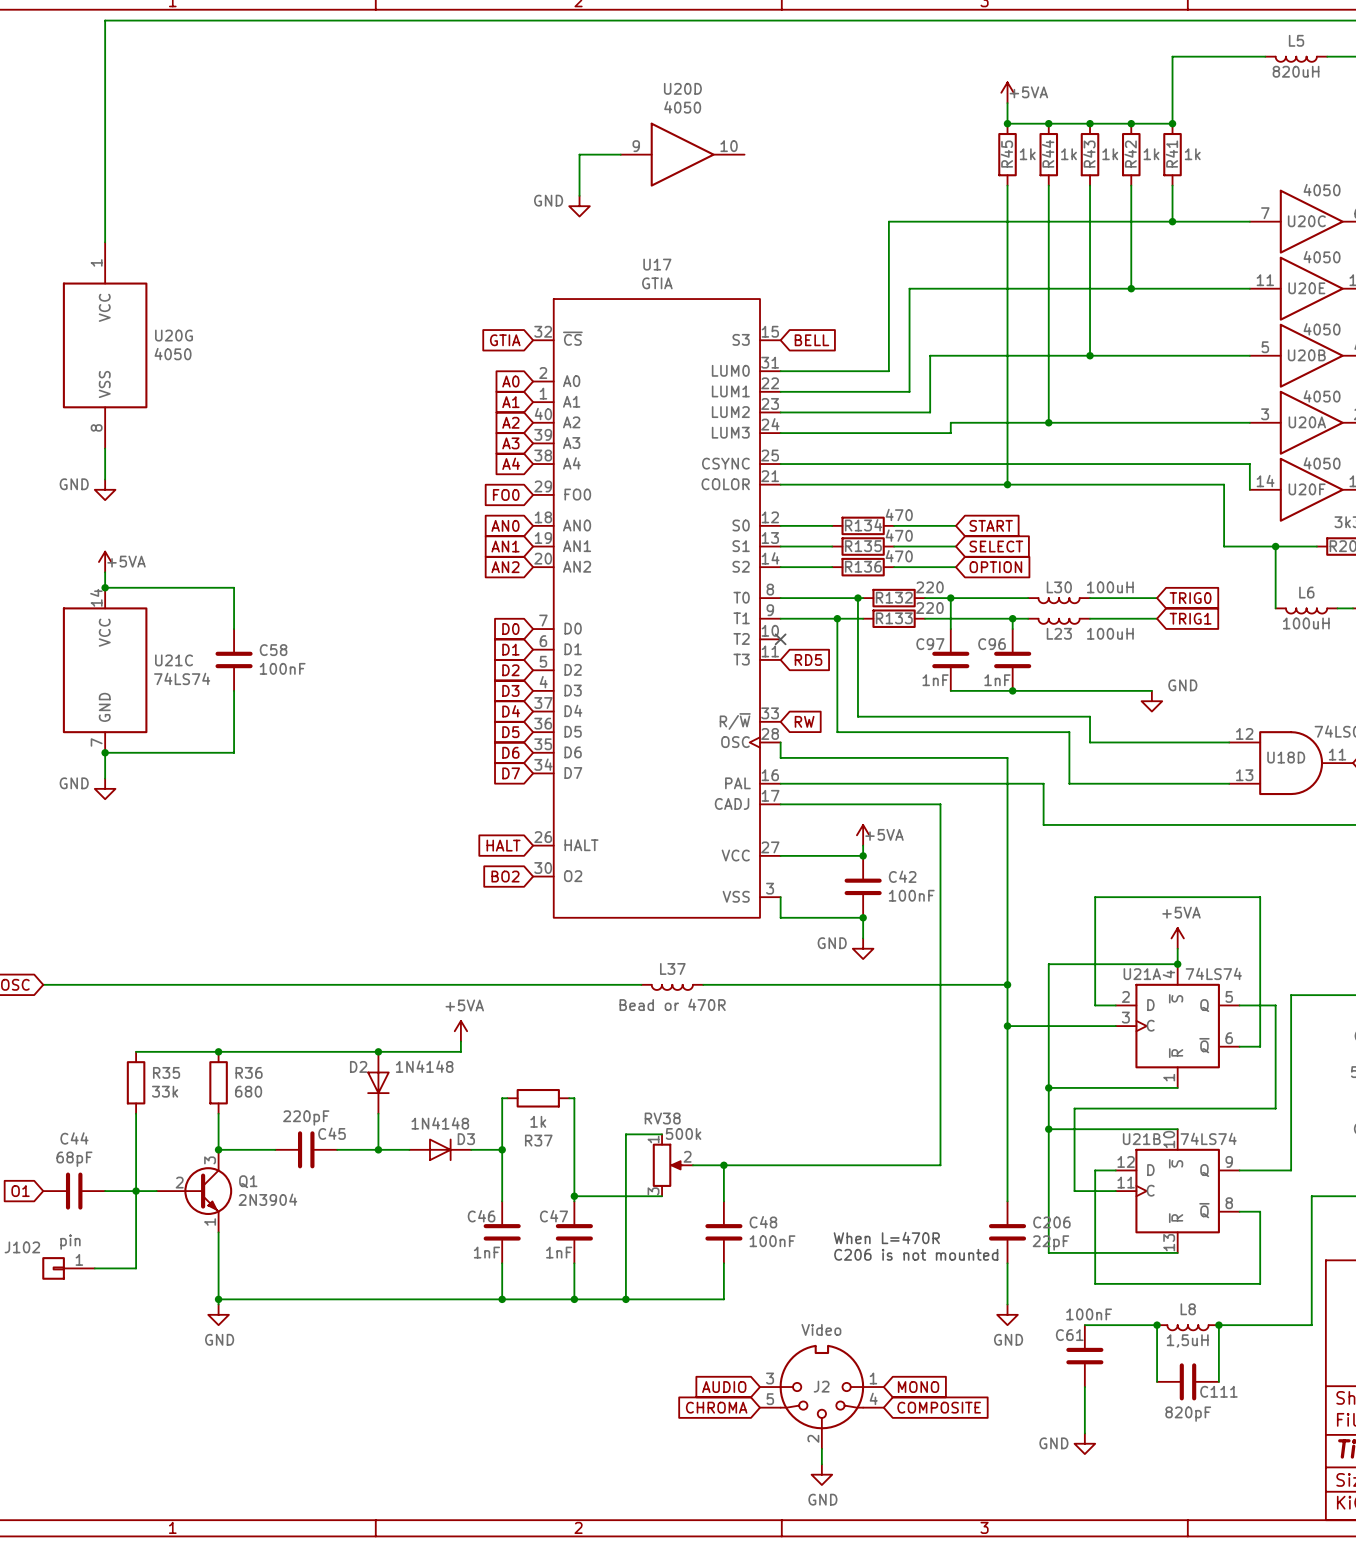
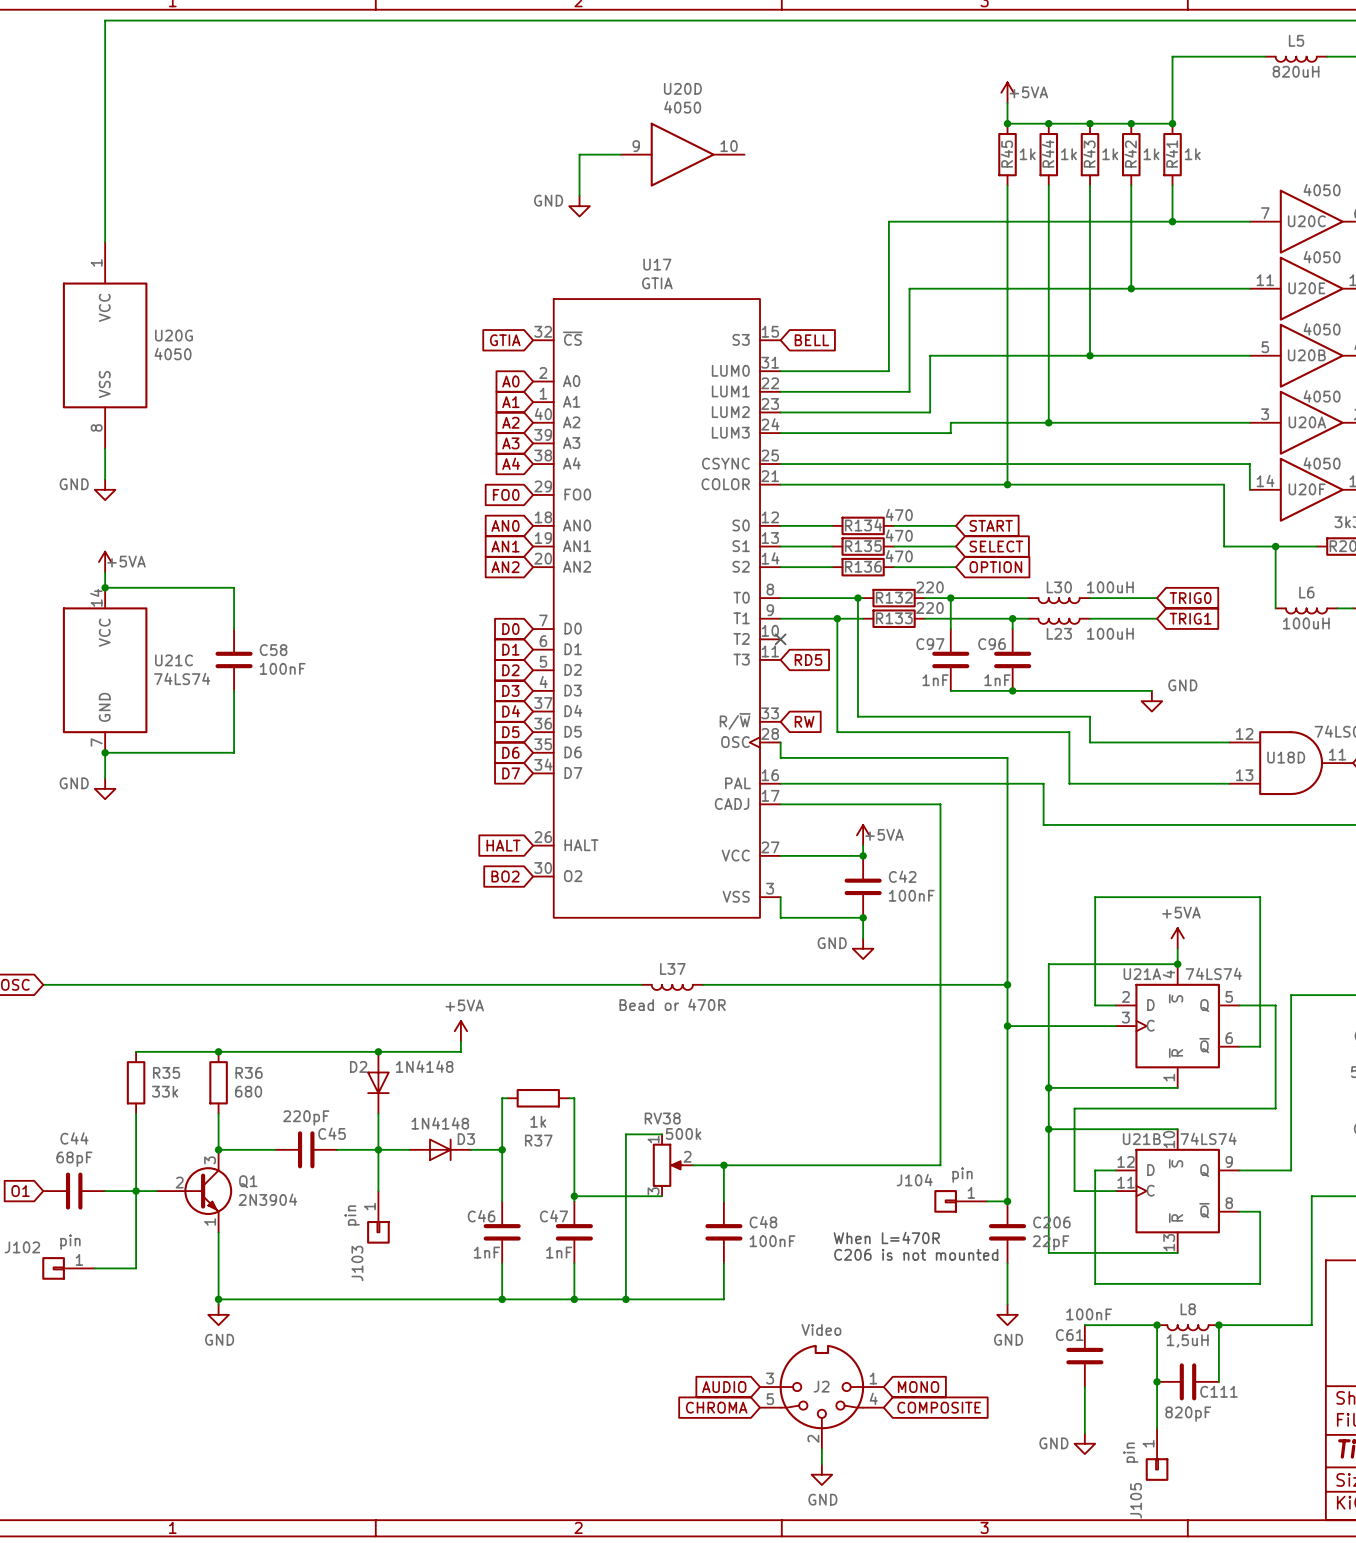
wire: none -> (378, 1149) (378, 1191)
J104: none -> pin (960, 1201)
wire: none -> (986, 1201) (1007, 1201)
junction: none -> (1007, 1201)
J103: none -> pin (378, 1217)
wire: none -> (1157, 1381) (1157, 1428)
junction: none -> (1157, 1381)
J105: none -> pin (1157, 1454)

